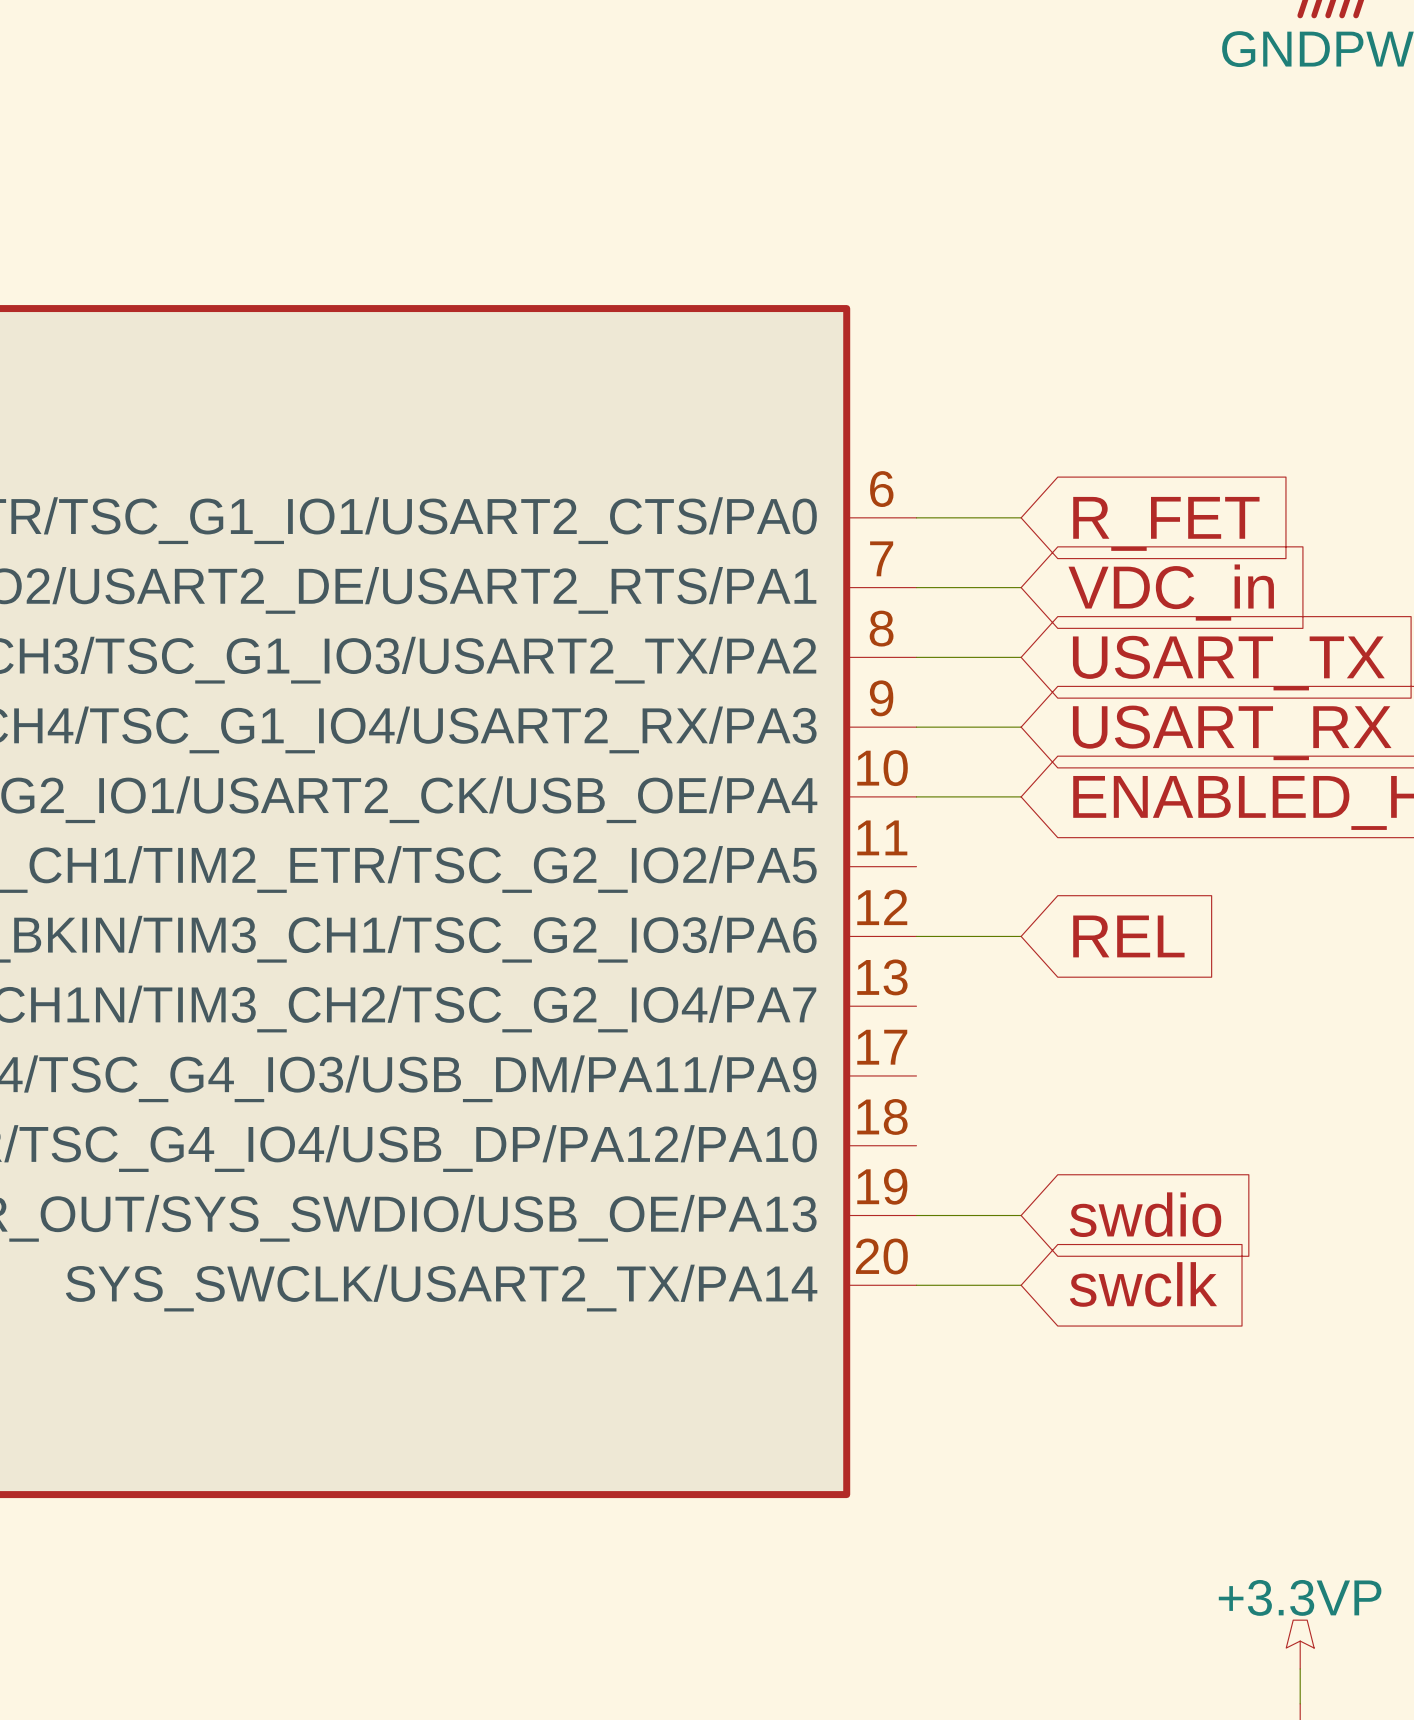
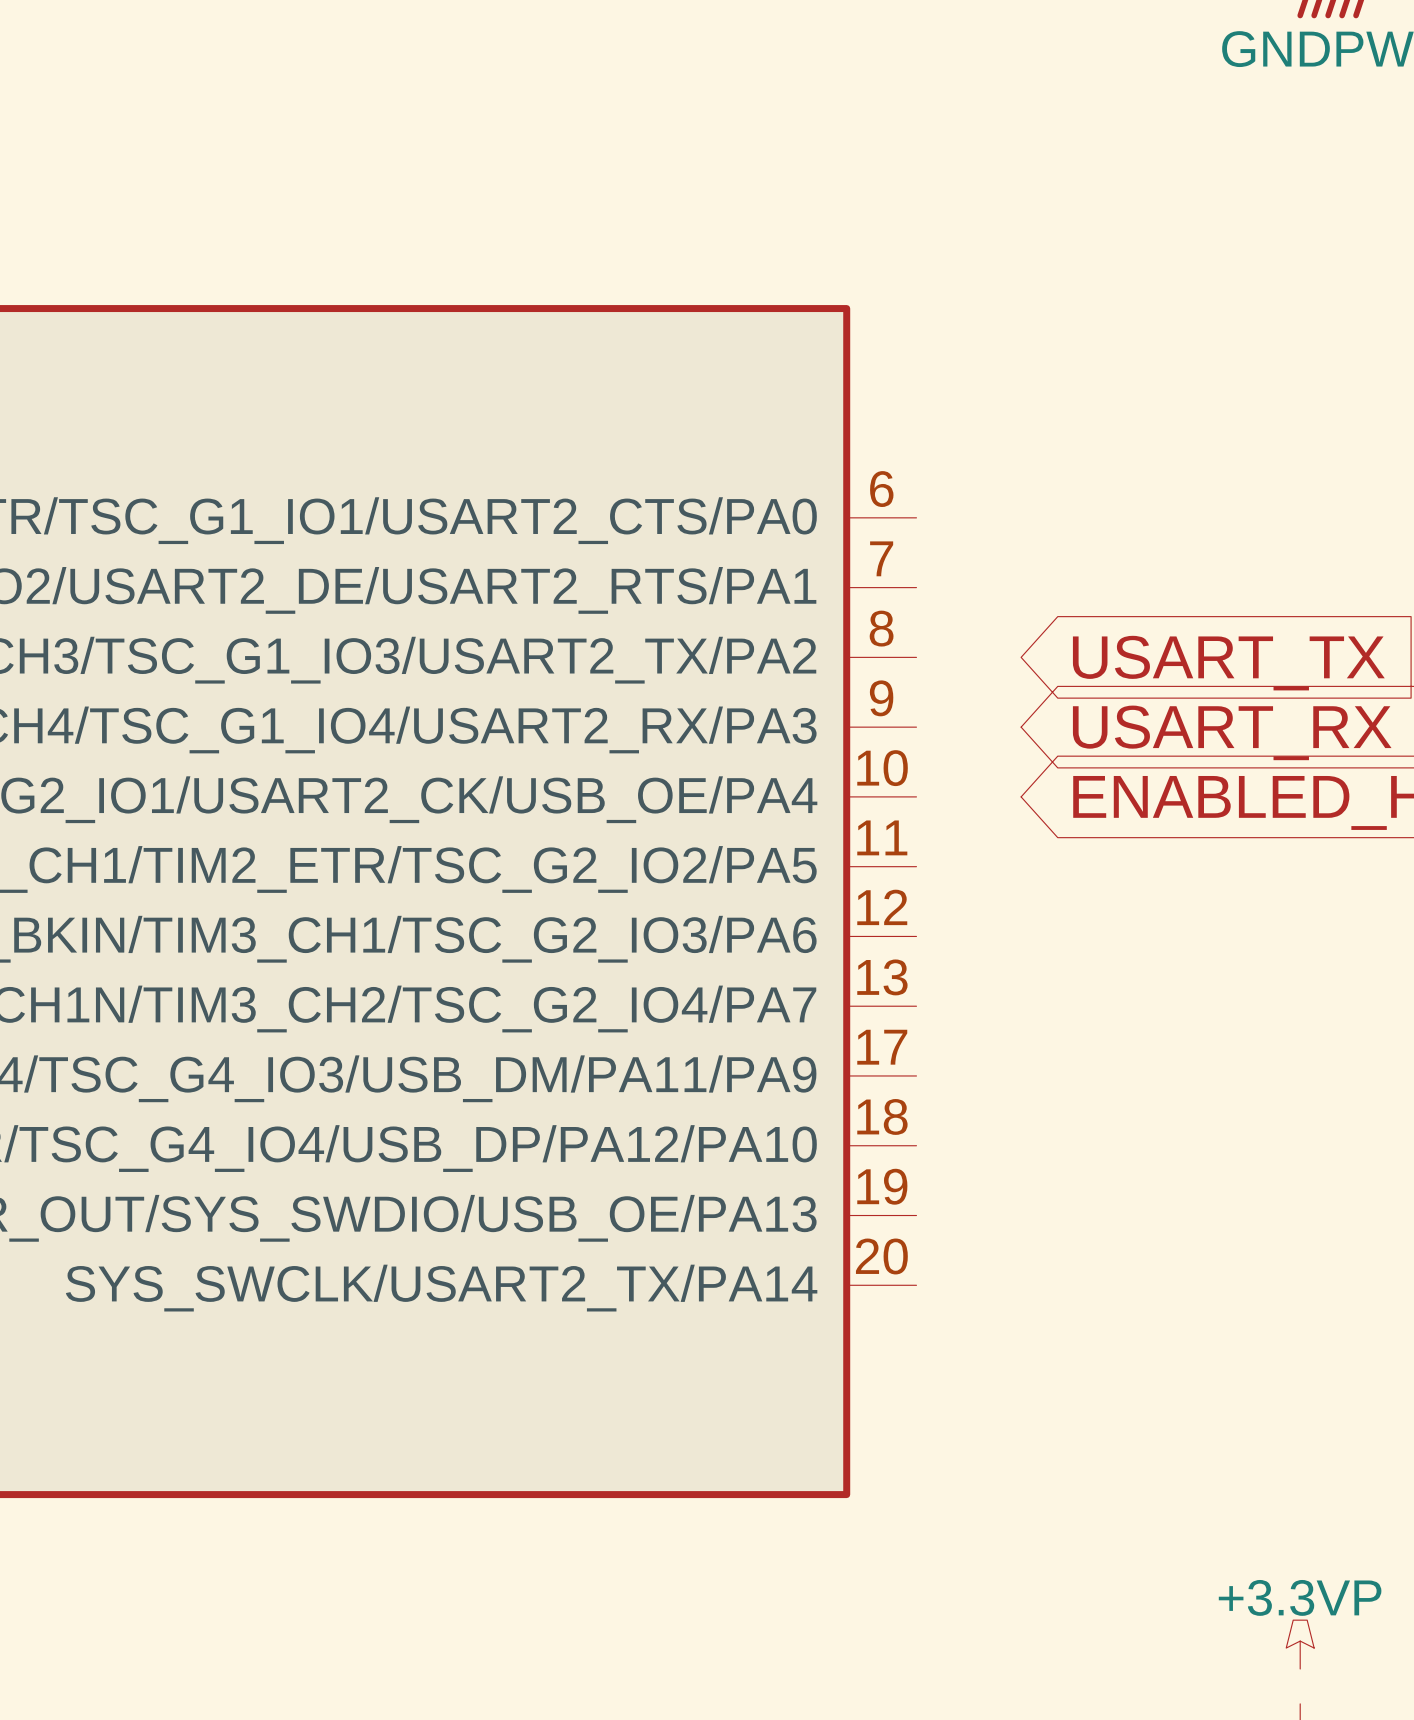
wire: (916, 517) (1021, 517) -> none
global label: R_FET (1166, 523) -> none
wire: (916, 587) (1021, 587) -> none
global label: VDC_in (1171, 592) -> none
wire: (916, 657) (1021, 657) -> none
wire: (916, 727) (1021, 727) -> none
wire: (916, 796) (1021, 796) -> none
wire: (916, 936) (1021, 936) -> none
global label: REL (1128, 936) -> none
global label: swdio (1145, 1214) -> none
wire: (916, 1215) (1021, 1215) -> none
global label: swclk (1143, 1284) -> none
wire: (916, 1285) (1021, 1285) -> none
wire: (1300, 1669) (1300, 1703) -> none

